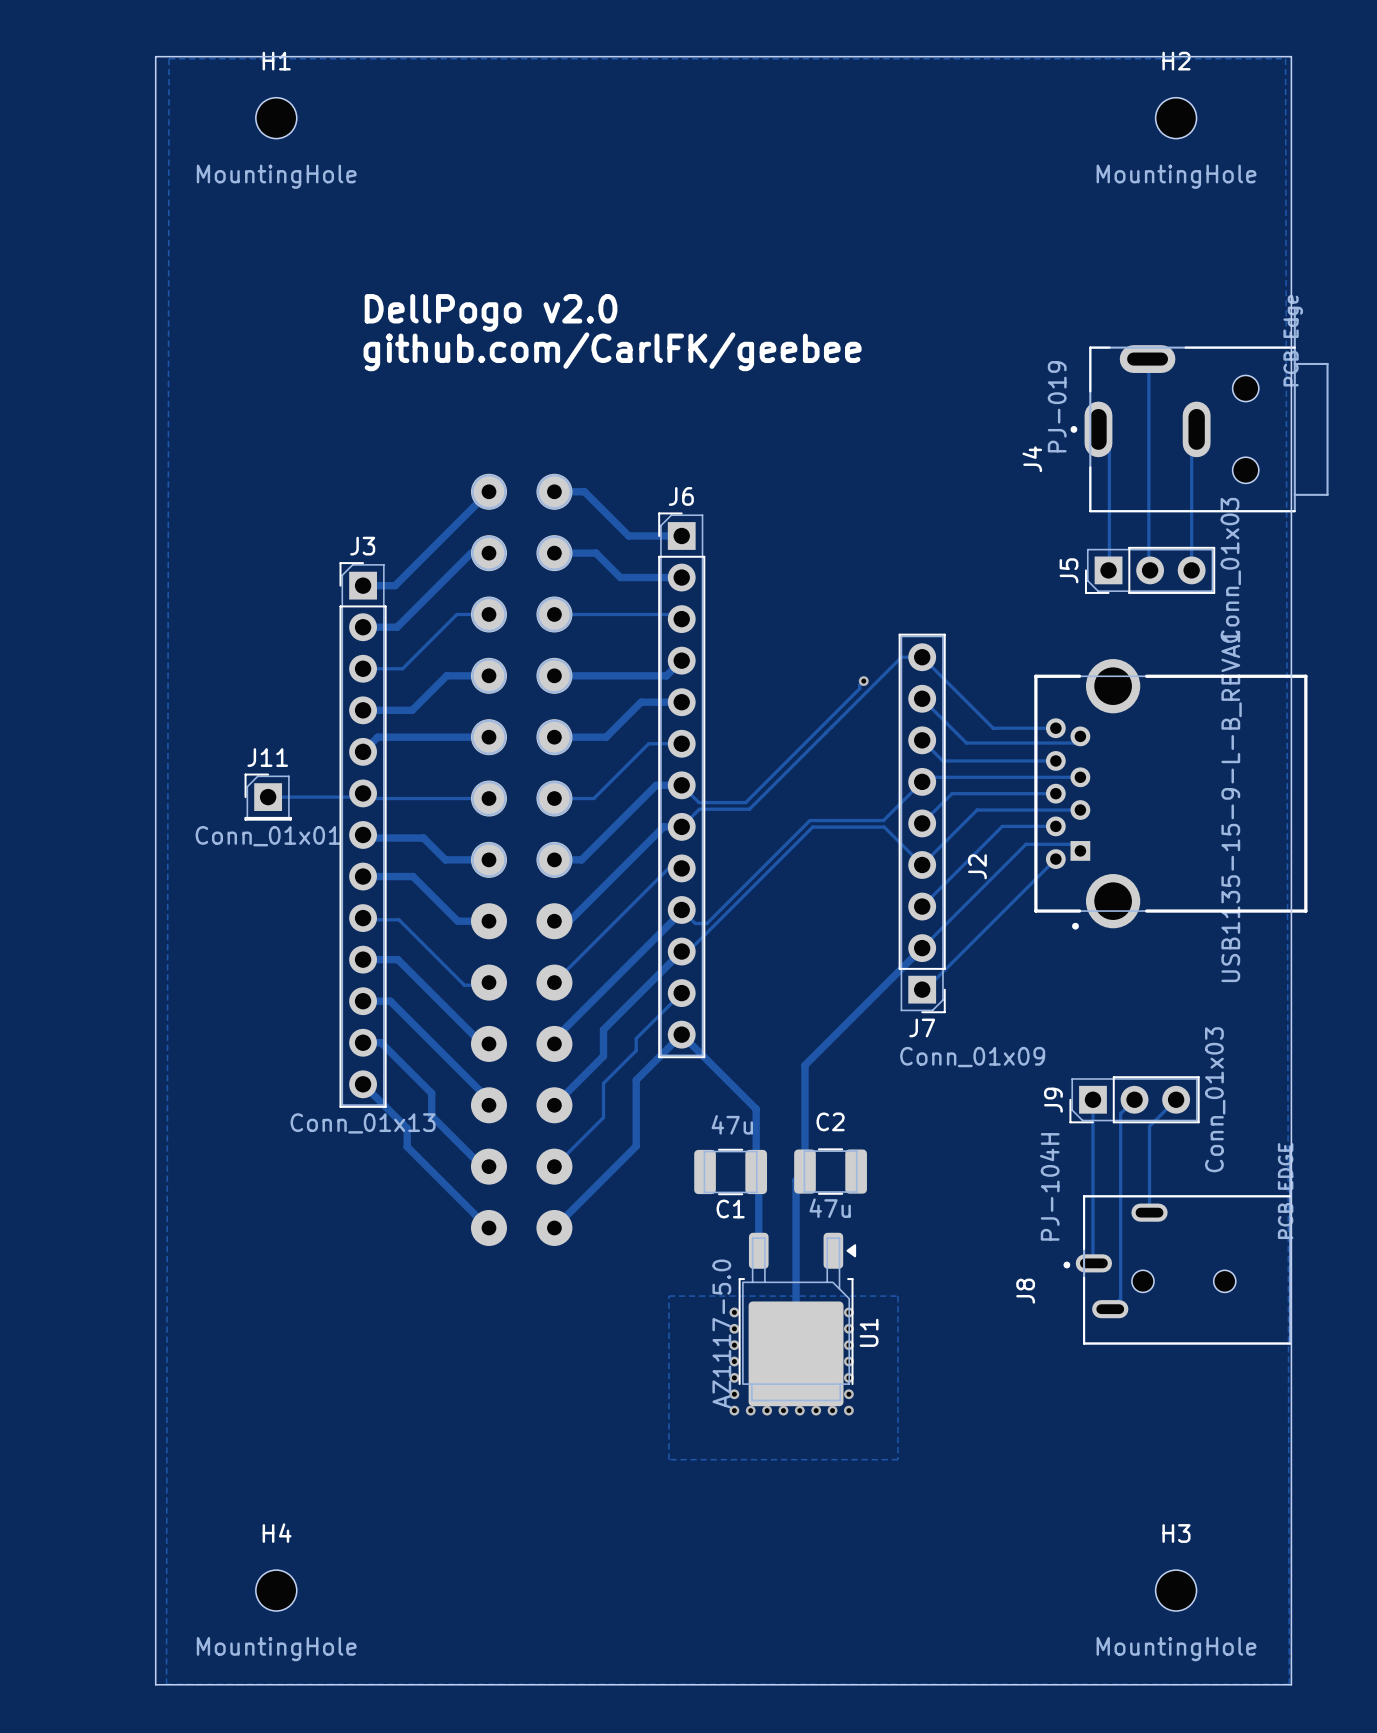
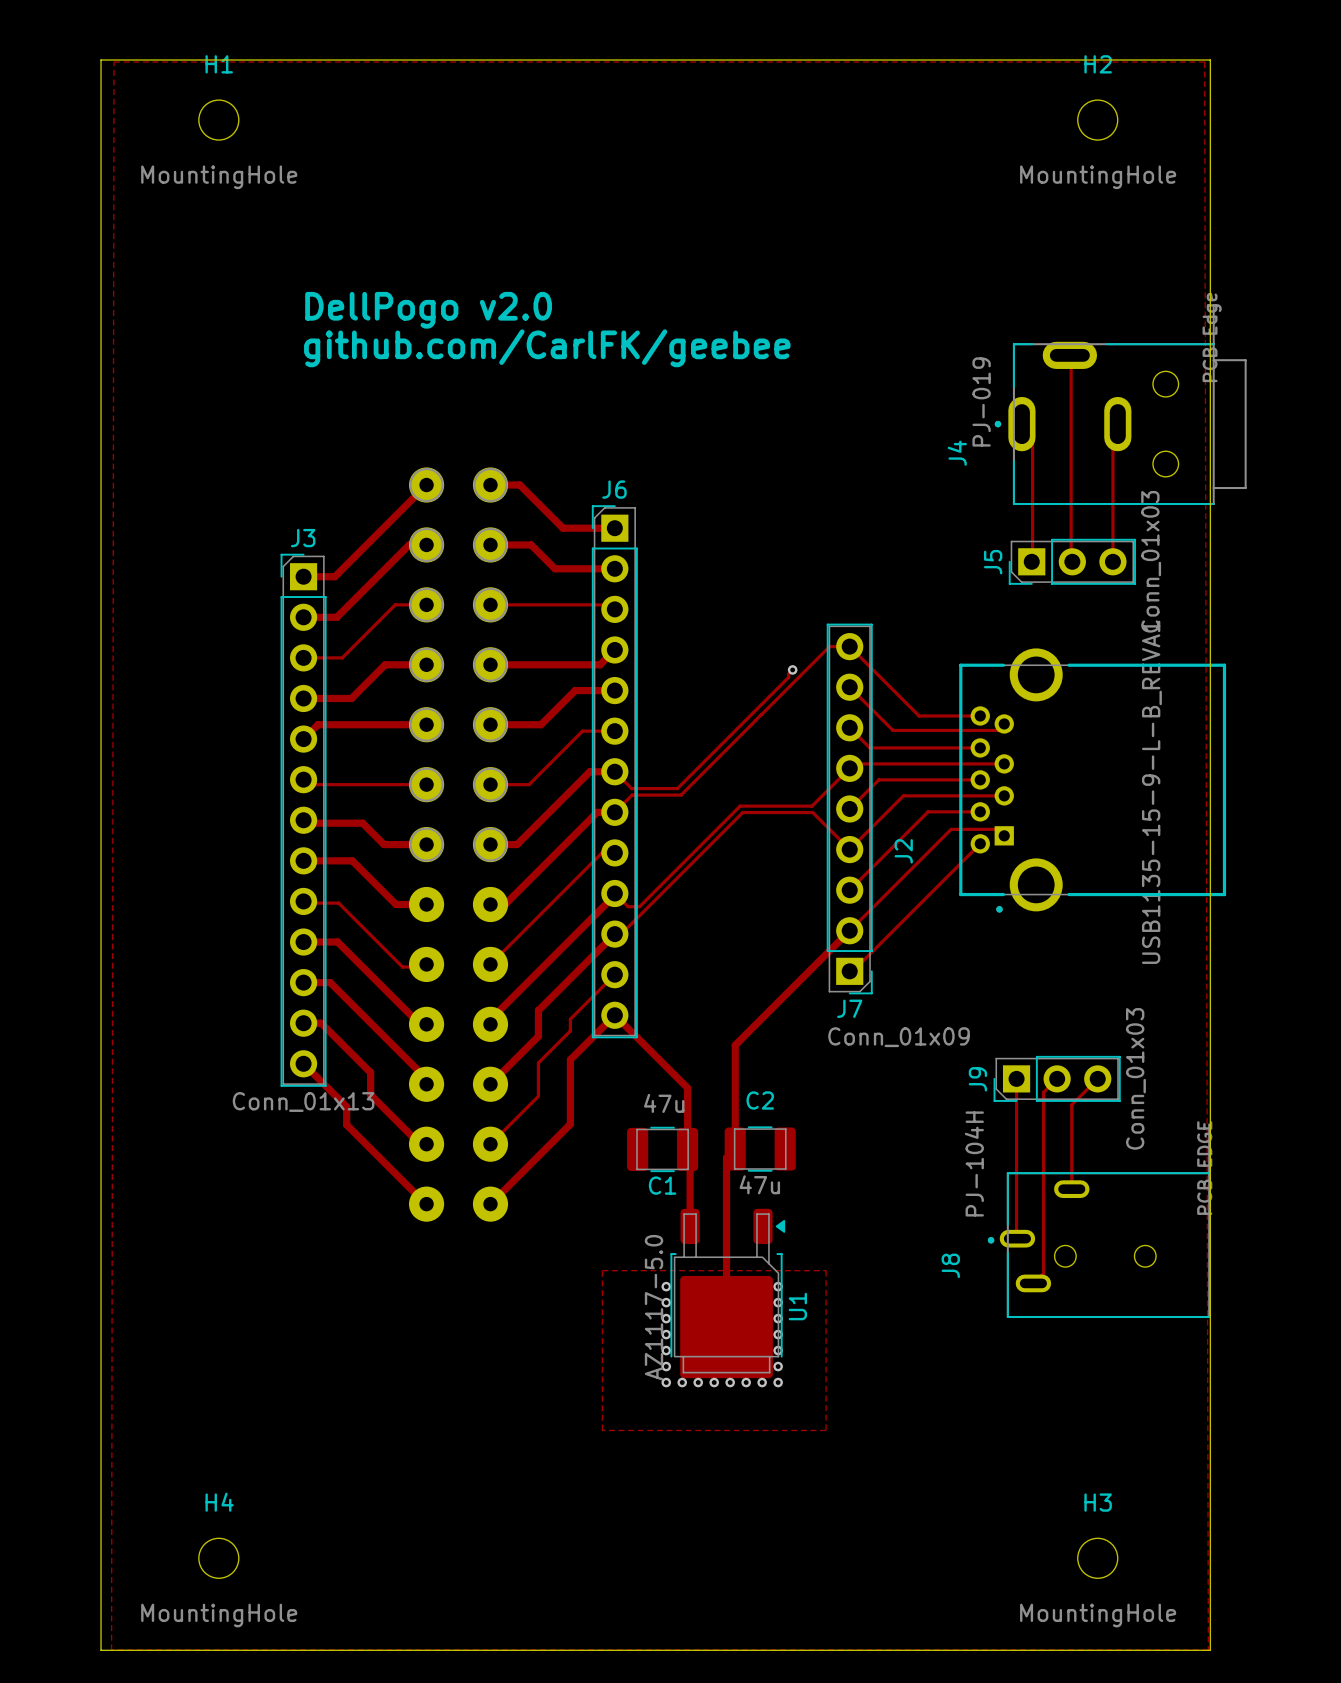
track: (363, 793) (358, 797) (268, 797) -> none
J11: Conn_01x01 (268, 797) -> none

